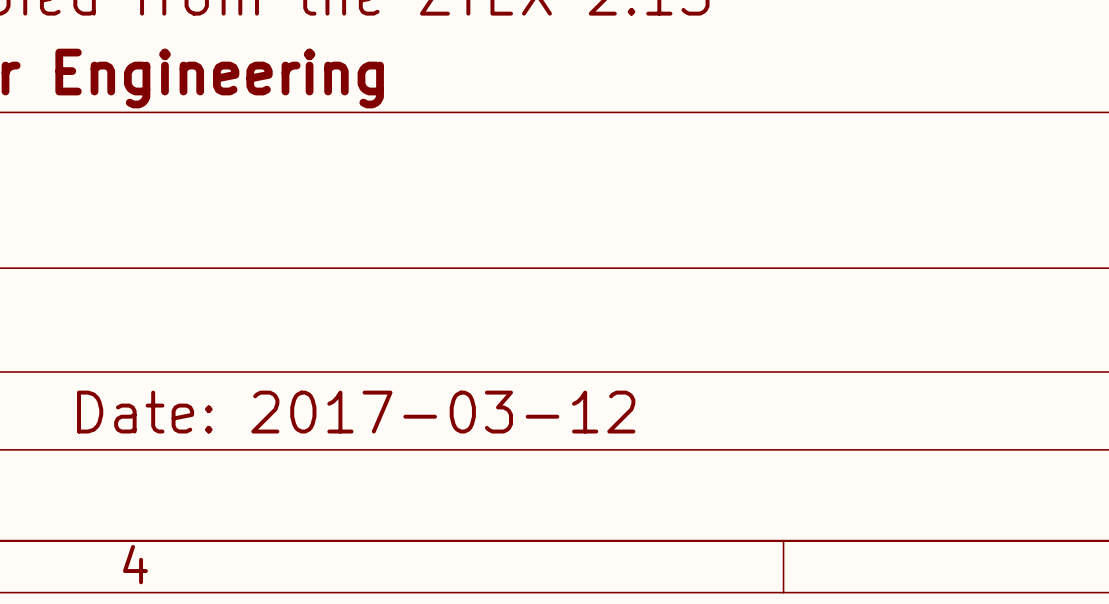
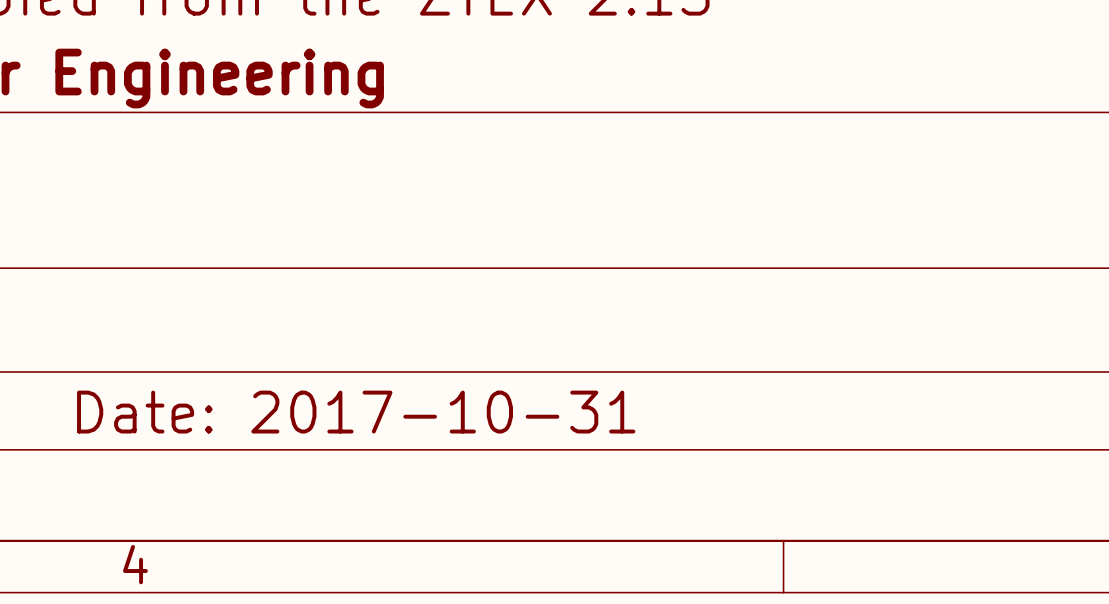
title block: Date: 2017-03-12 (356, 412) -> Date: 2017-10-31 (356, 412)

